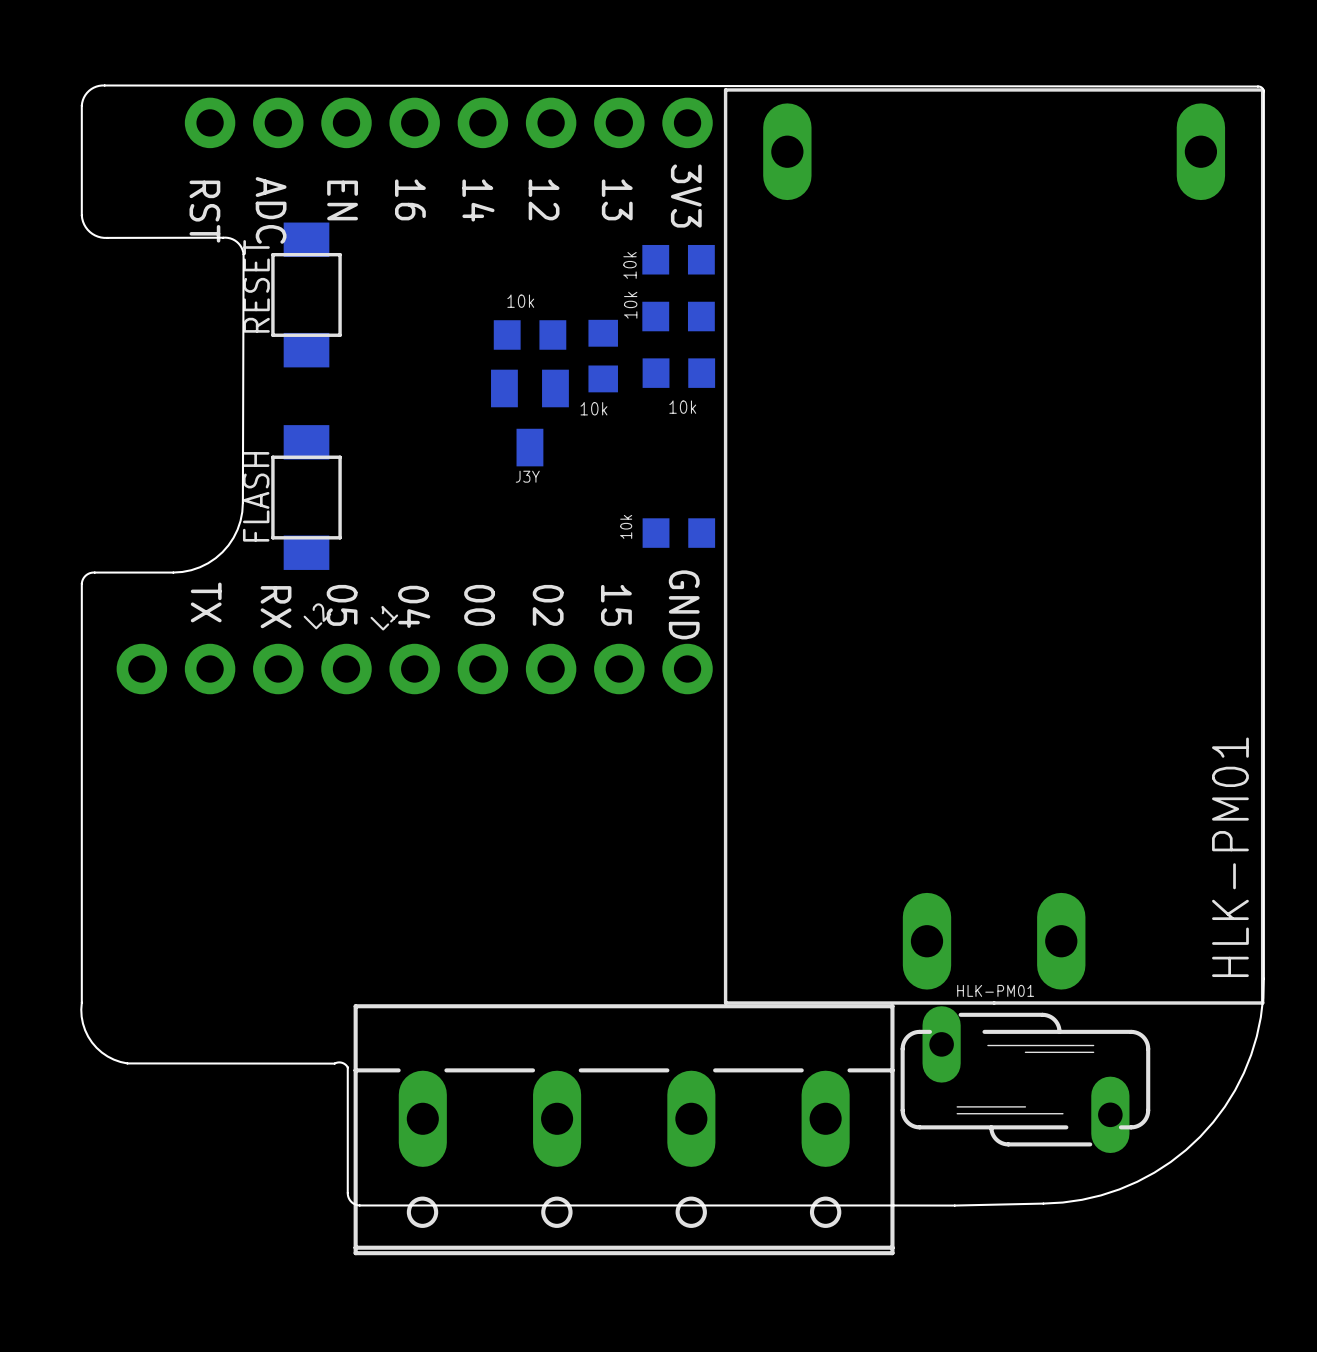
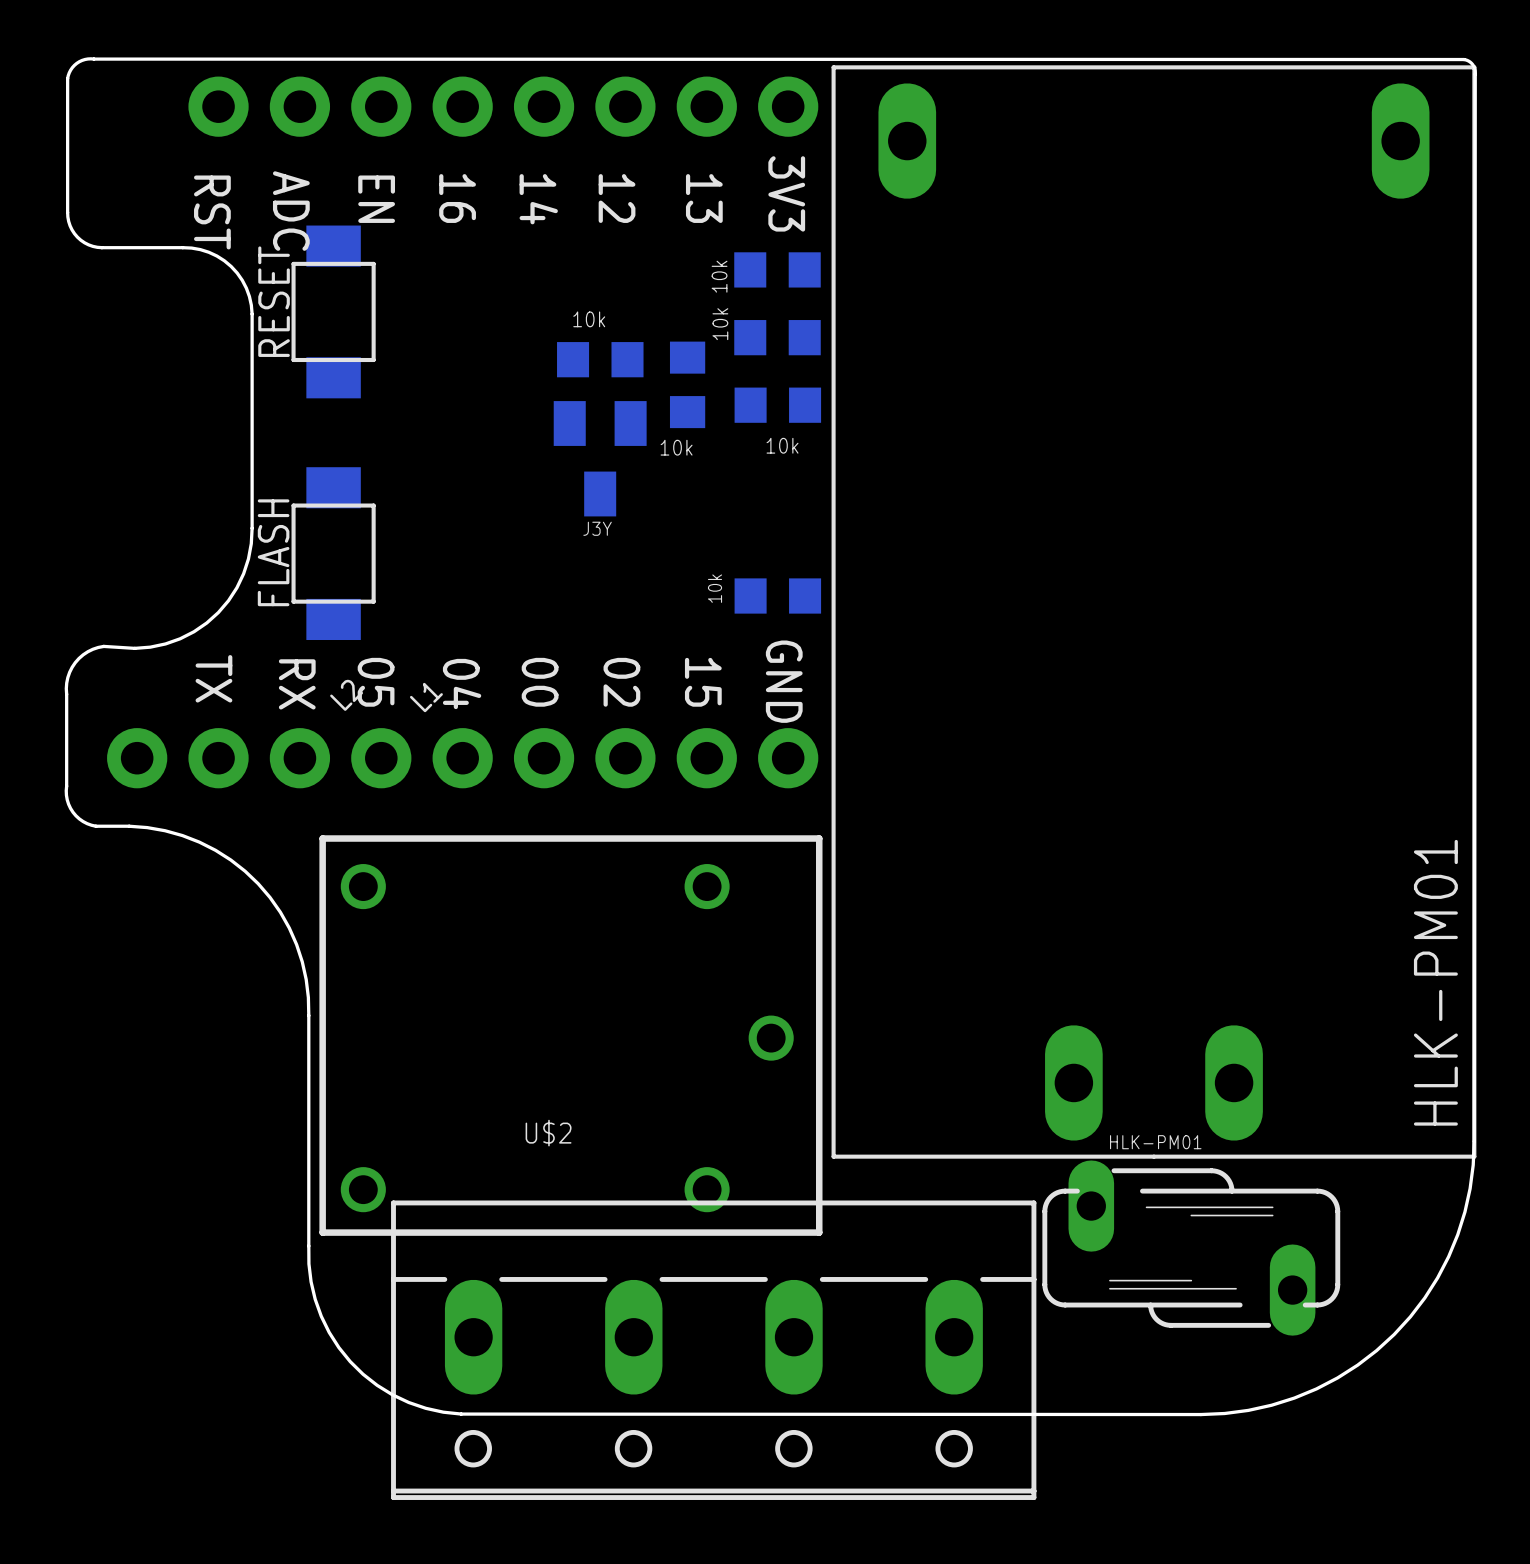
board edge: (104, 85) (1258, 86) (1262, 88) (1263, 998) (1256, 1036) (1243, 1072) (1224, 1106) (1200, 1136) (1170, 1162) (1137, 1181) (1100, 1195) (1062, 1202) (954, 1205) (359, 1205) (351, 1201) (347, 1194) (347, 1067) (344, 1063) (127, 1063) (107, 1056) (96, 1047) (85, 1030) (81, 1009) (82, 582) (86, 575) (91, 572) (173, 572) (199, 567) (215, 558) (233, 537) (240, 521) (242, 503) (242, 249) (236, 241) (228, 237) (104, 237) (95, 235) (87, 229) (81, 215) (81, 105) (83, 97) (89, 90) (96, 86) (104, 85) -> (93, 59) (1464, 59) (1471, 63) (1475, 72) (1473, 1165) (1464, 1211) (1448, 1256) (1424, 1297) (1394, 1334) (1357, 1365) (1316, 1388) (1294, 1398) (1248, 1410) (1200, 1414) (461, 1414) (425, 1408) (408, 1402) (392, 1394) (363, 1374) (338, 1347) (329, 1332) (321, 1316) (311, 1281) (308, 1263) (308, 997) (302, 961) (289, 928) (270, 897) (258, 883) (245, 871) (215, 850) (182, 835) (165, 830) (129, 826) (91, 825) (75, 815) (67, 799) (66, 688) (69, 672) (75, 662) (87, 651) (98, 647) (134, 648) (165, 643) (180, 638) (206, 622) (218, 612) (236, 587) (248, 558) (252, 528) (252, 314) (249, 296) (242, 280) (231, 266) (208, 252) (191, 248) (97, 247) (80, 240) (70, 225) (67, 212) (67, 78) (70, 70) (76, 63) (84, 59) (93, 59)
U$2: none -> (570, 1035)
part position: (624, 1129) -> (713, 1350)

